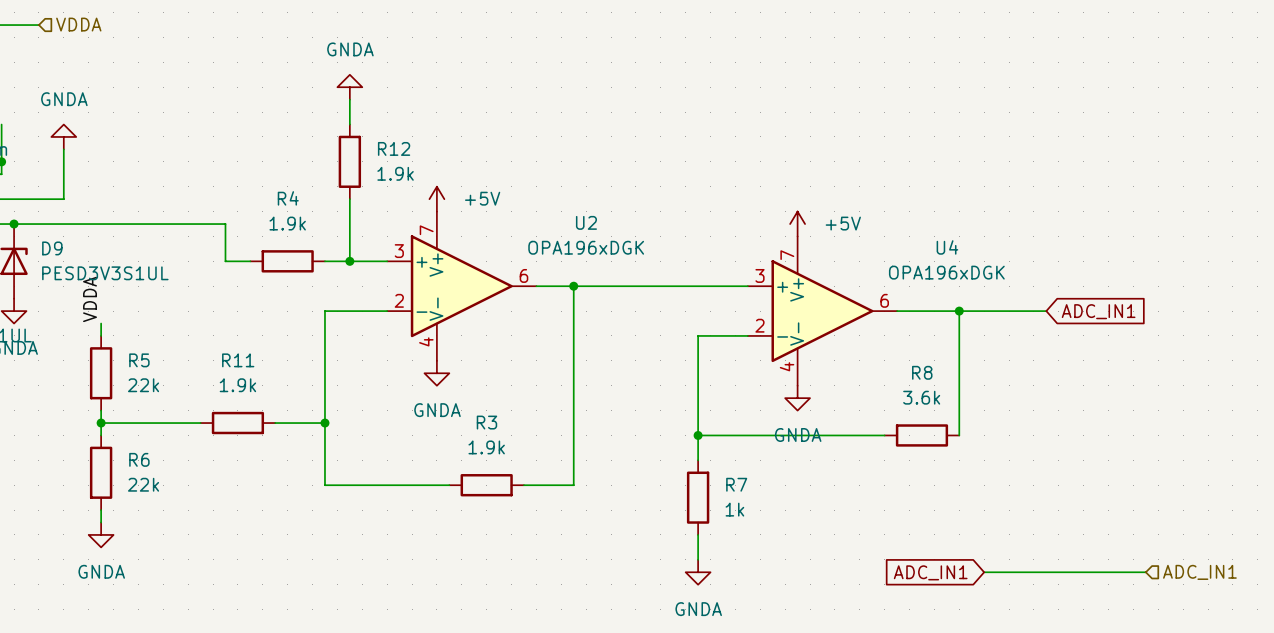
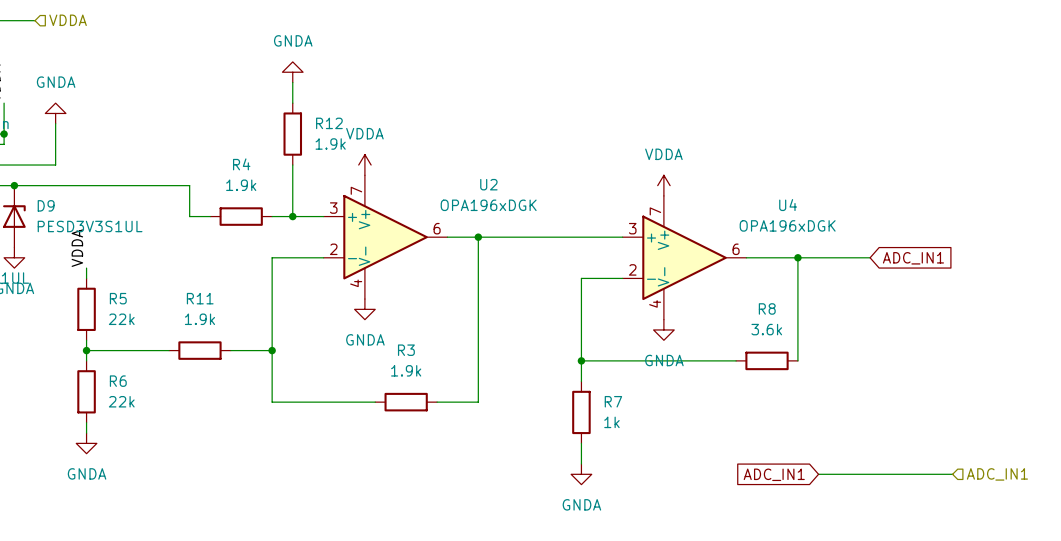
power symbol: +5V (436, 199) -> VDDA (364, 165)
power symbol: +5V (797, 224) -> VDDA (663, 185)

